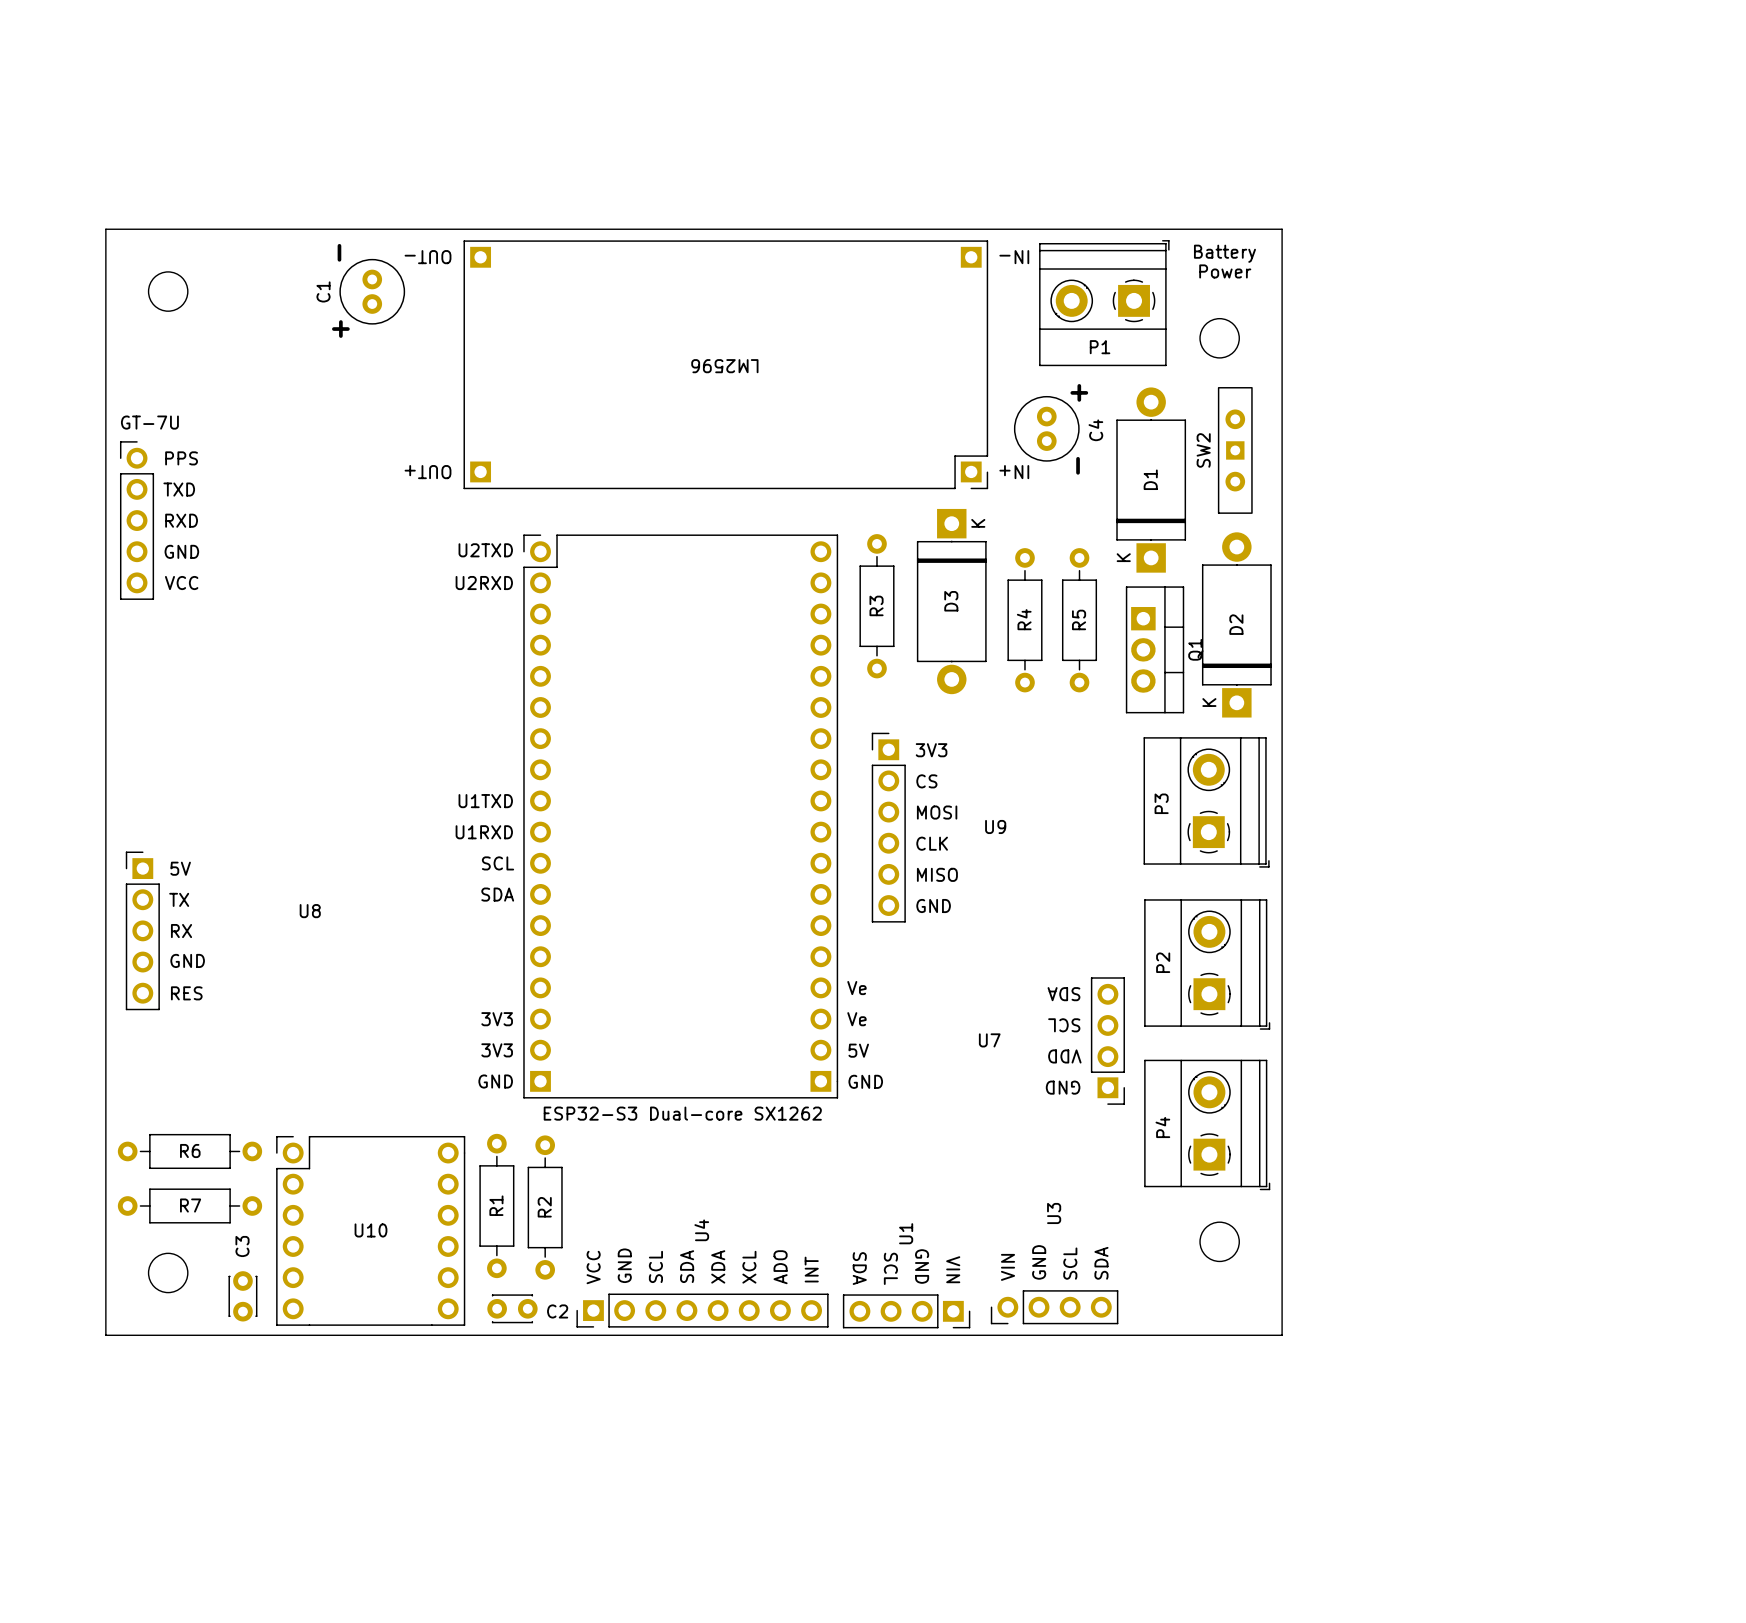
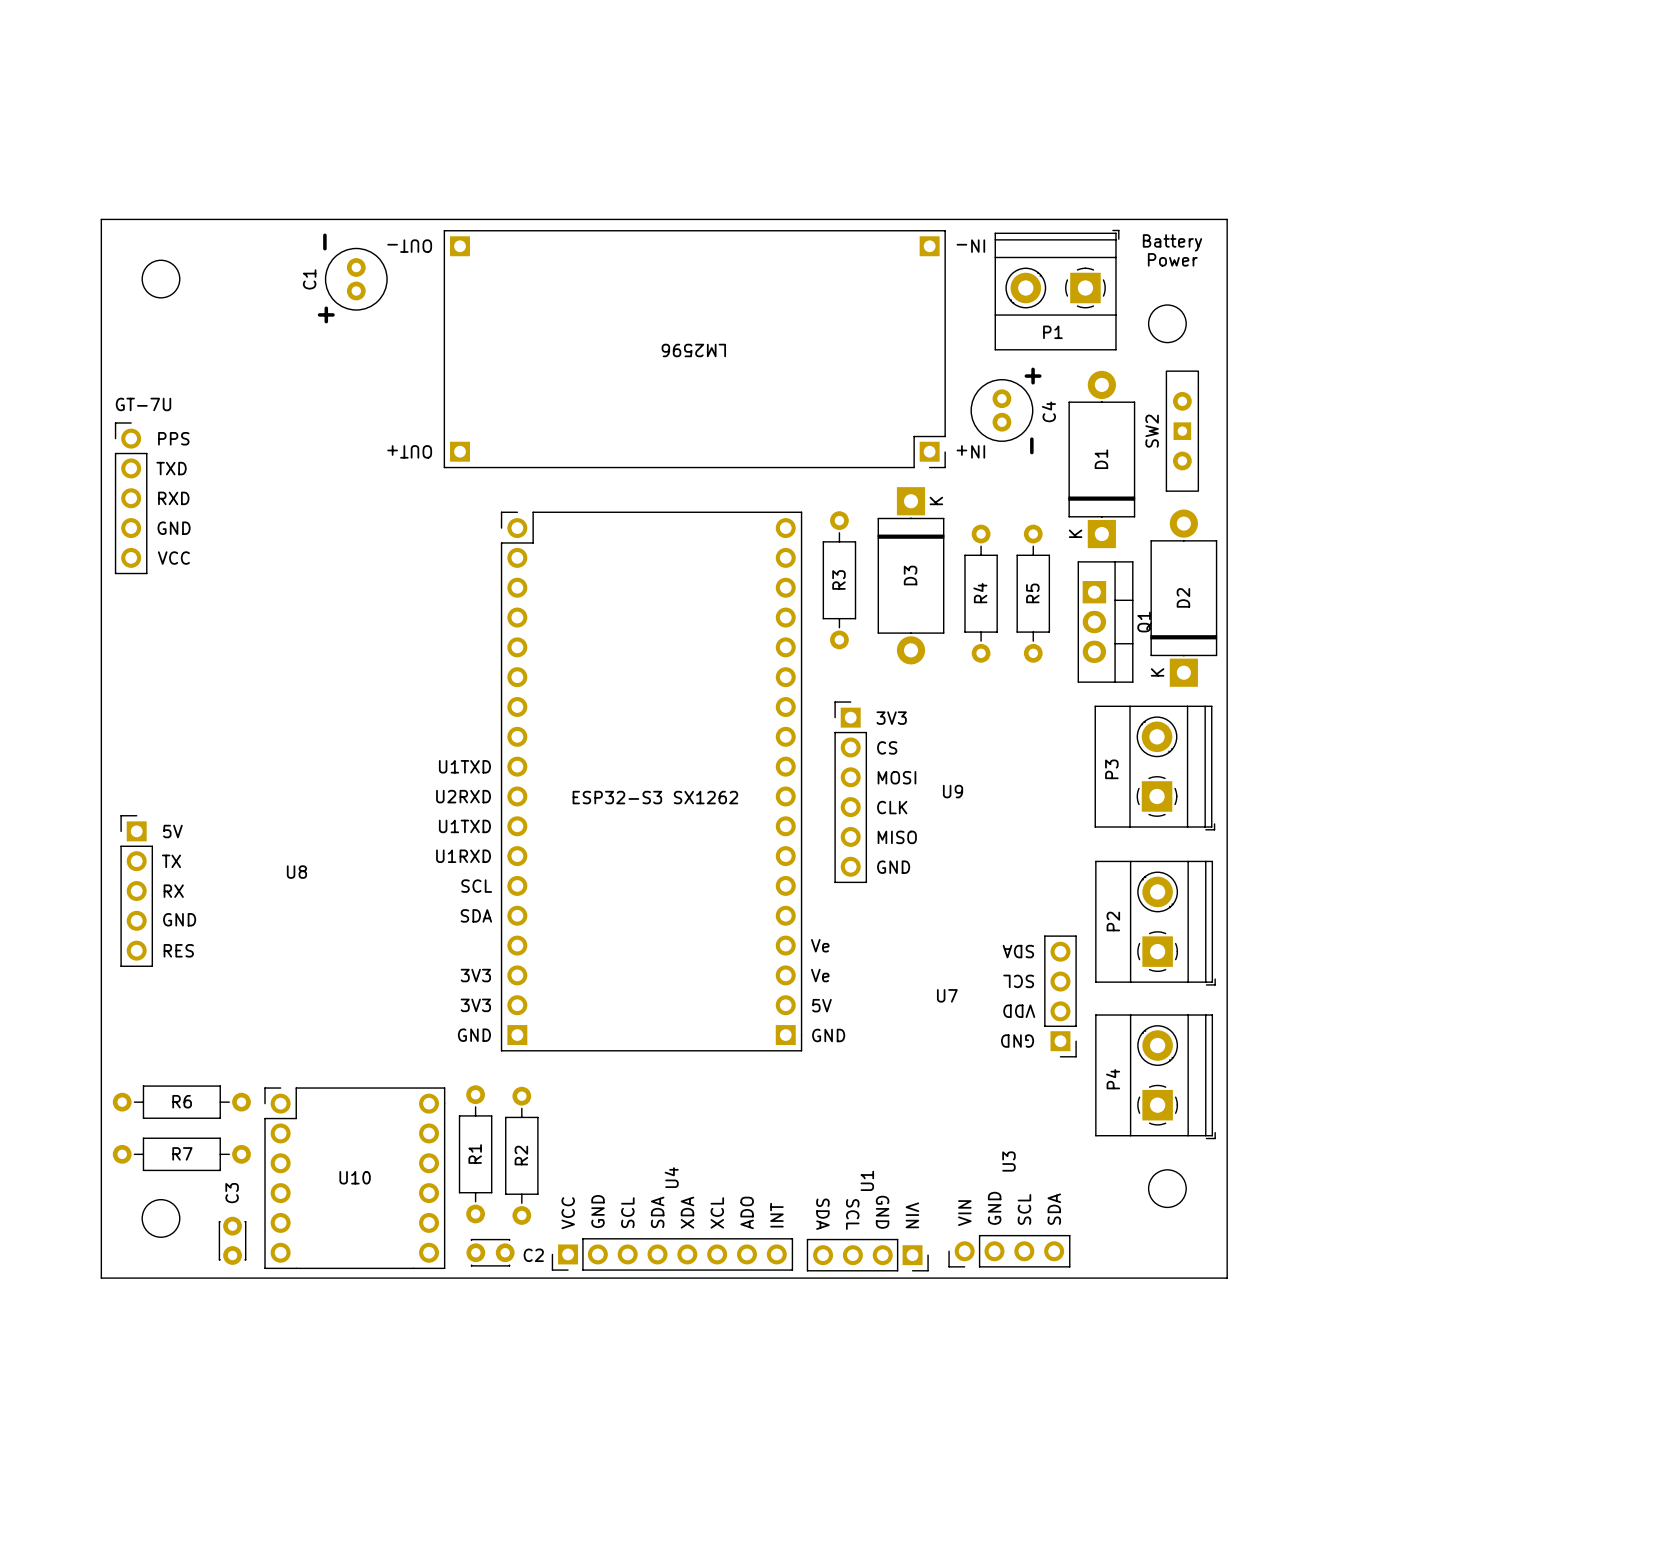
part footprint: [523, 534, 839, 1099] -> [500, 511, 803, 1052]

